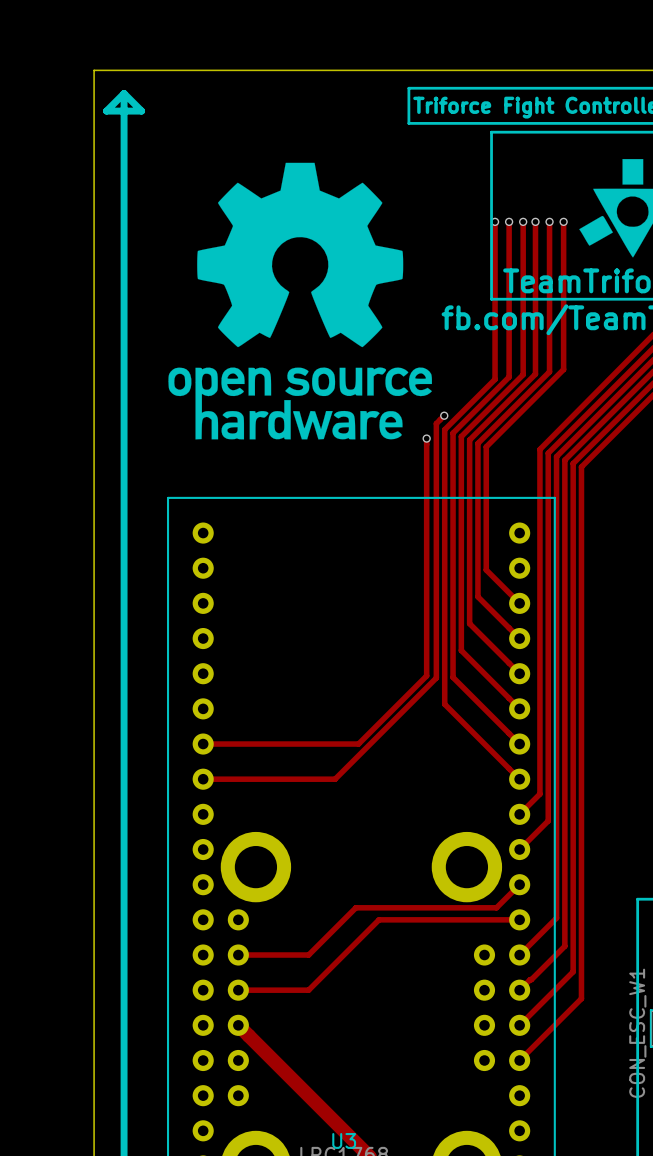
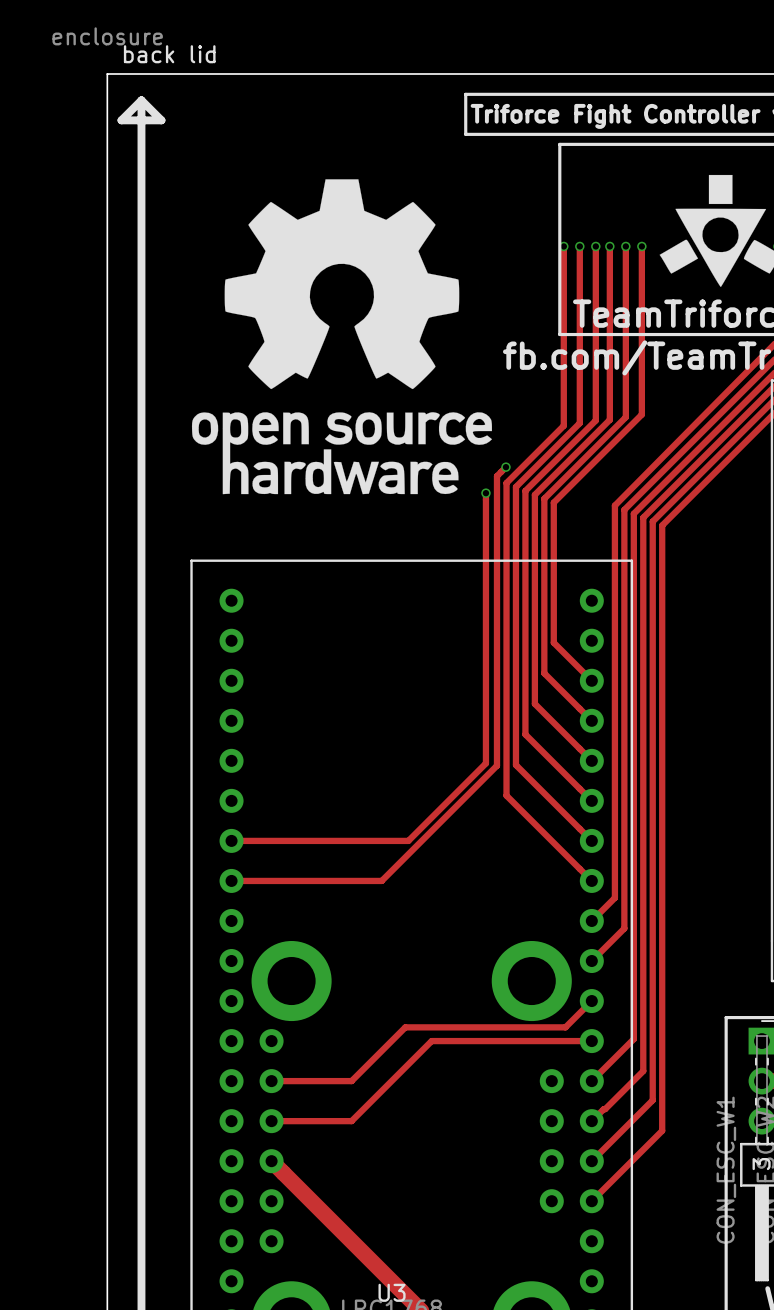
back lid: none -> enclosure (134, 45)

